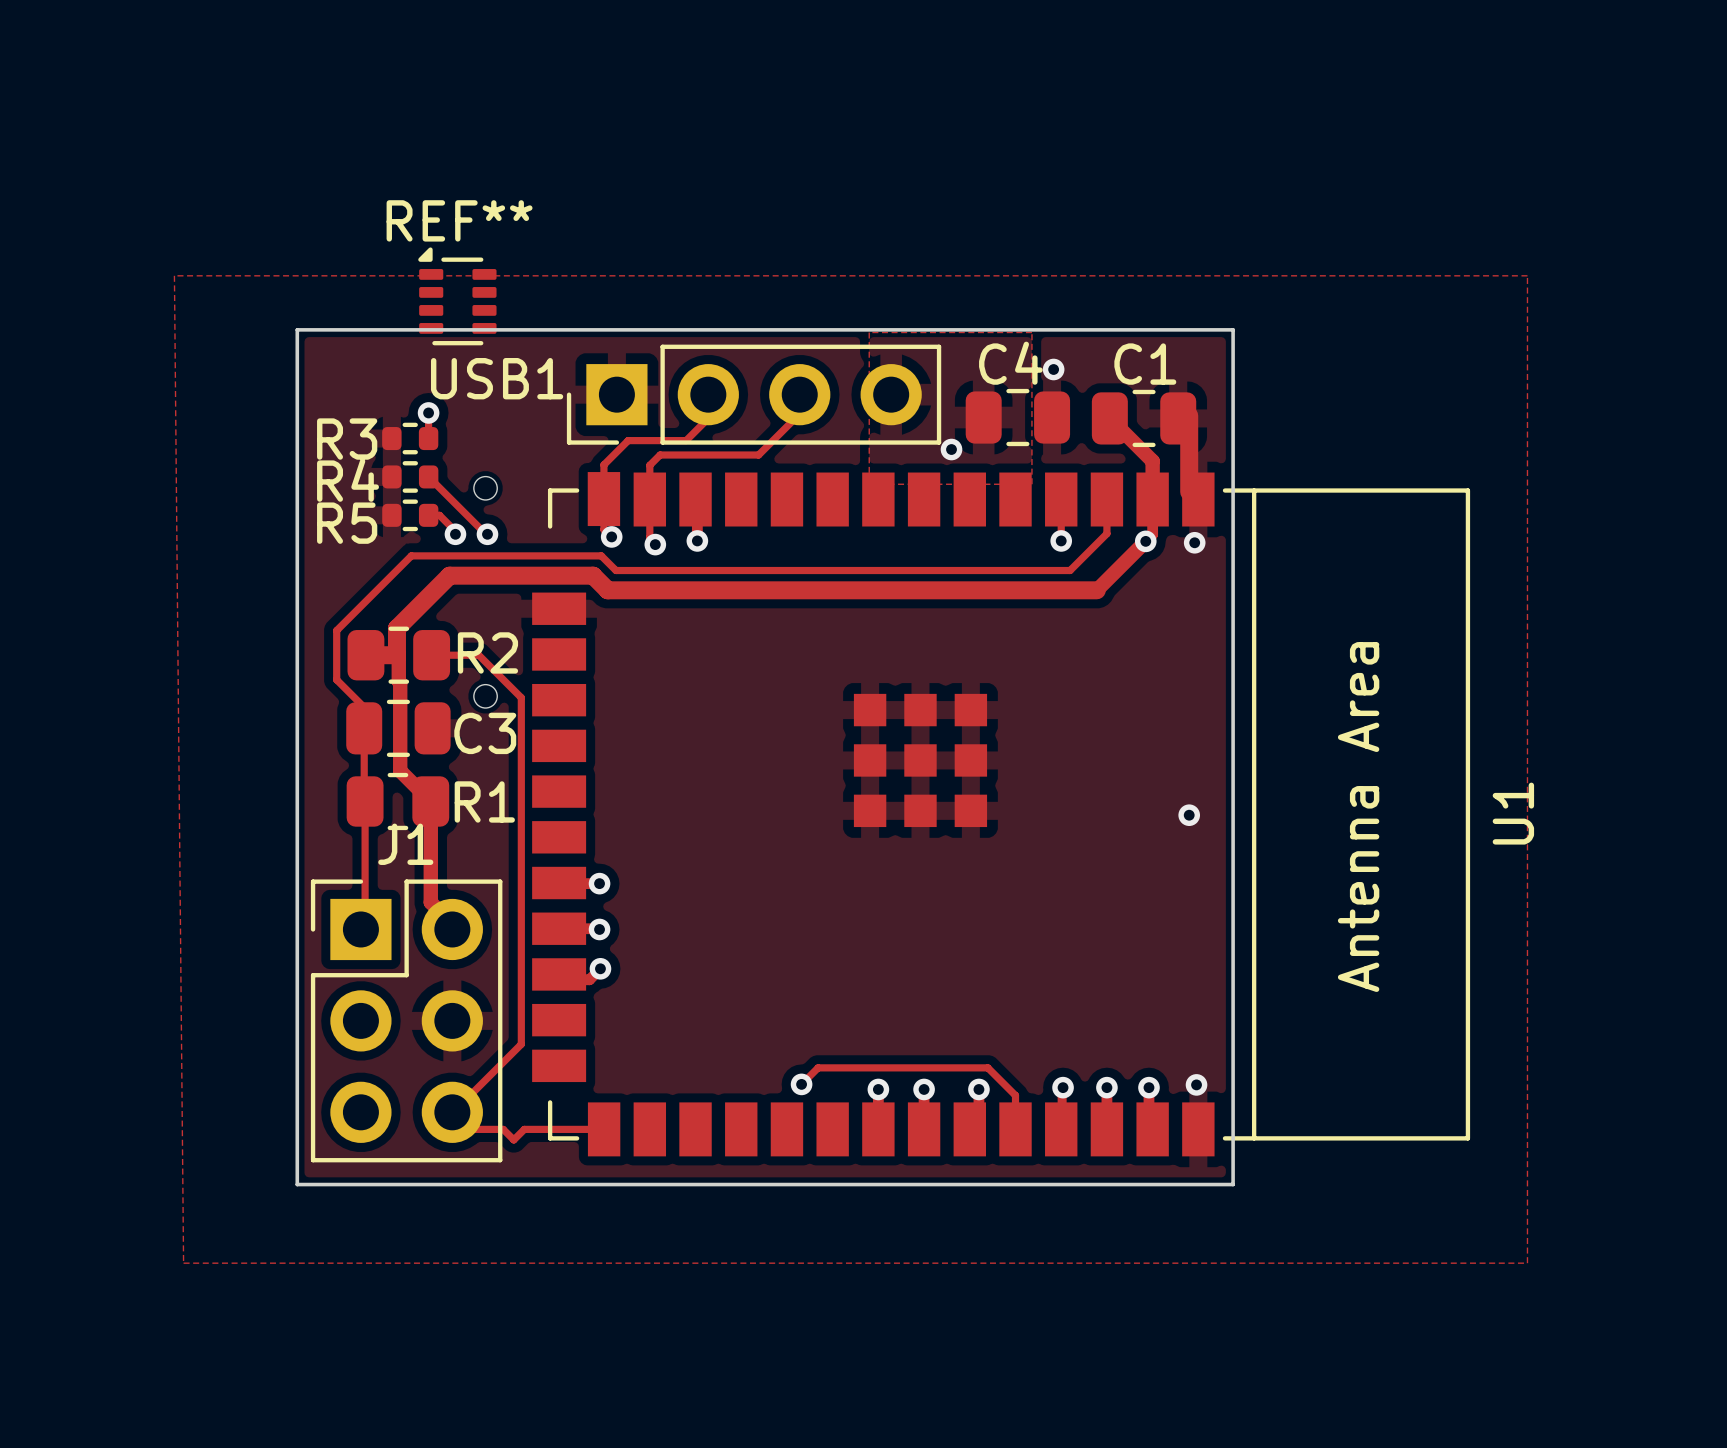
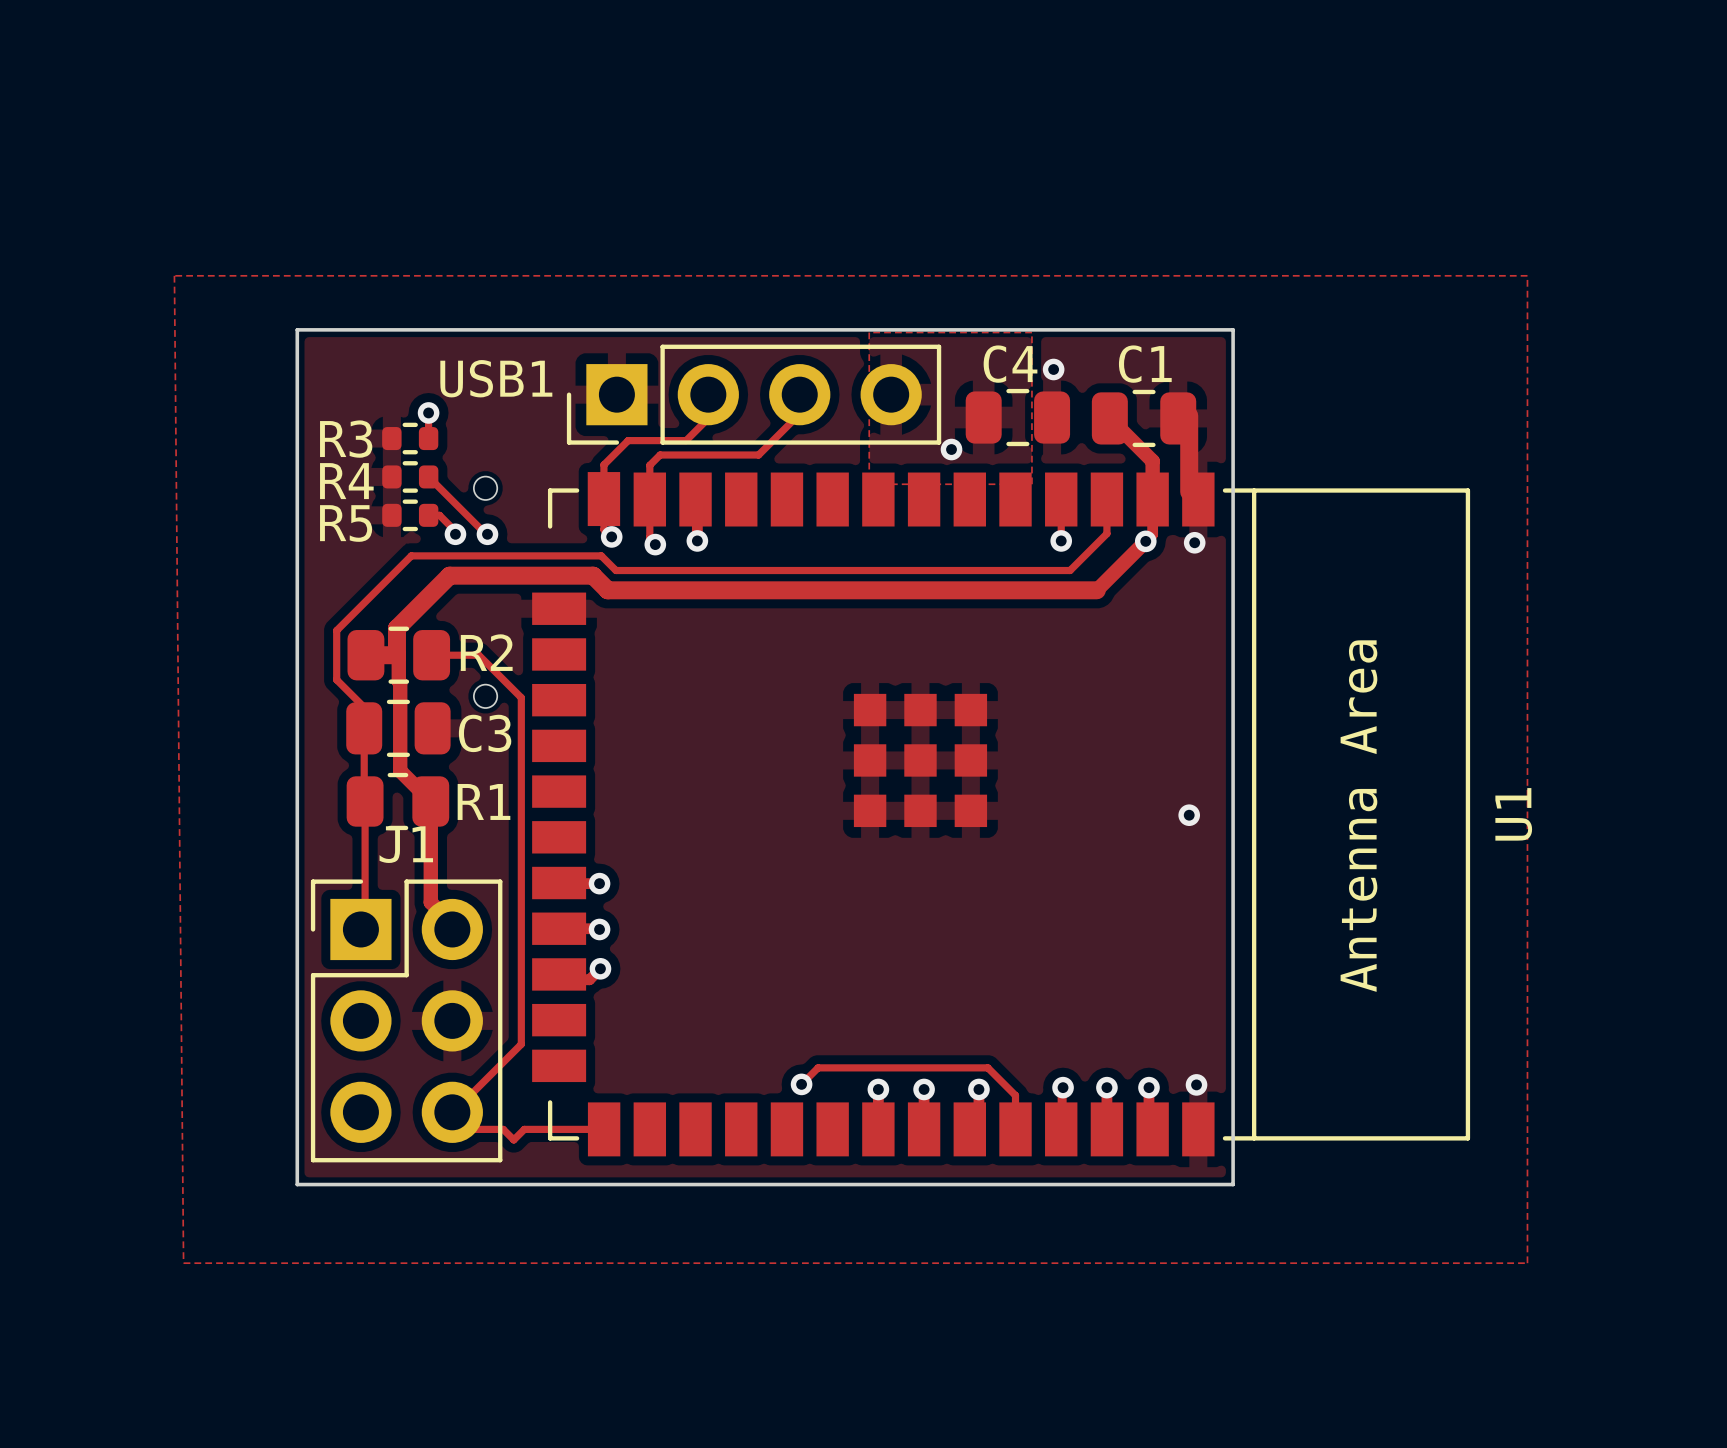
REF**: (457, 296) -> none

